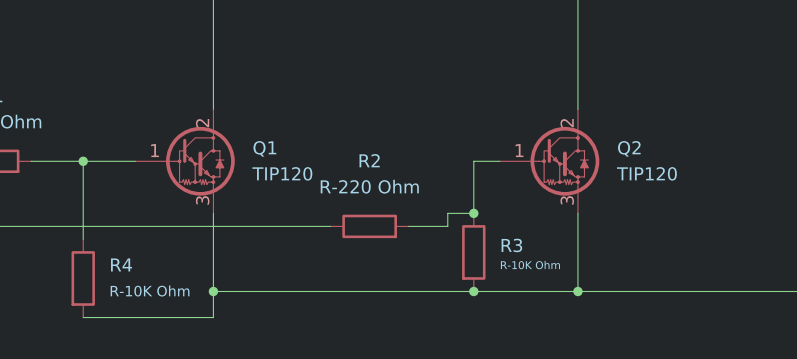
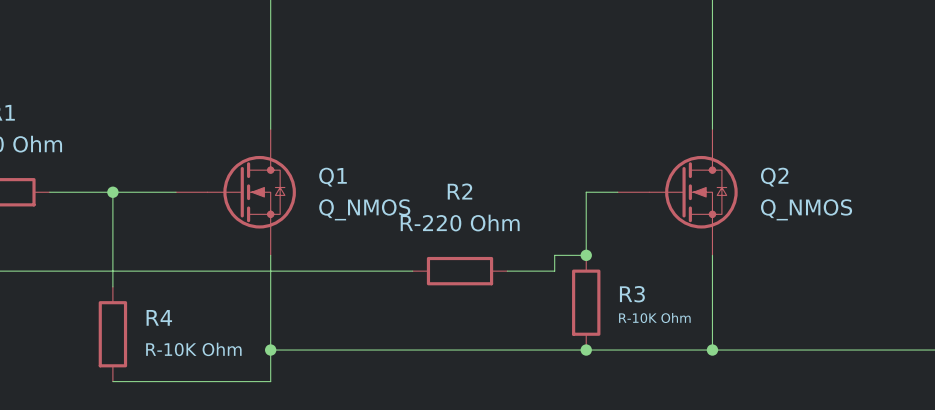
Q1 symbol: [135, 109, 235, 214] -> [176, 129, 296, 256]
Q2 symbol: [499, 109, 600, 214] -> [617, 129, 738, 256]
Q1 value: TIP120 (282, 173) -> Q_NMOS (364, 209)
Q2 value: TIP120 (646, 173) -> Q_NMOS (806, 209)

